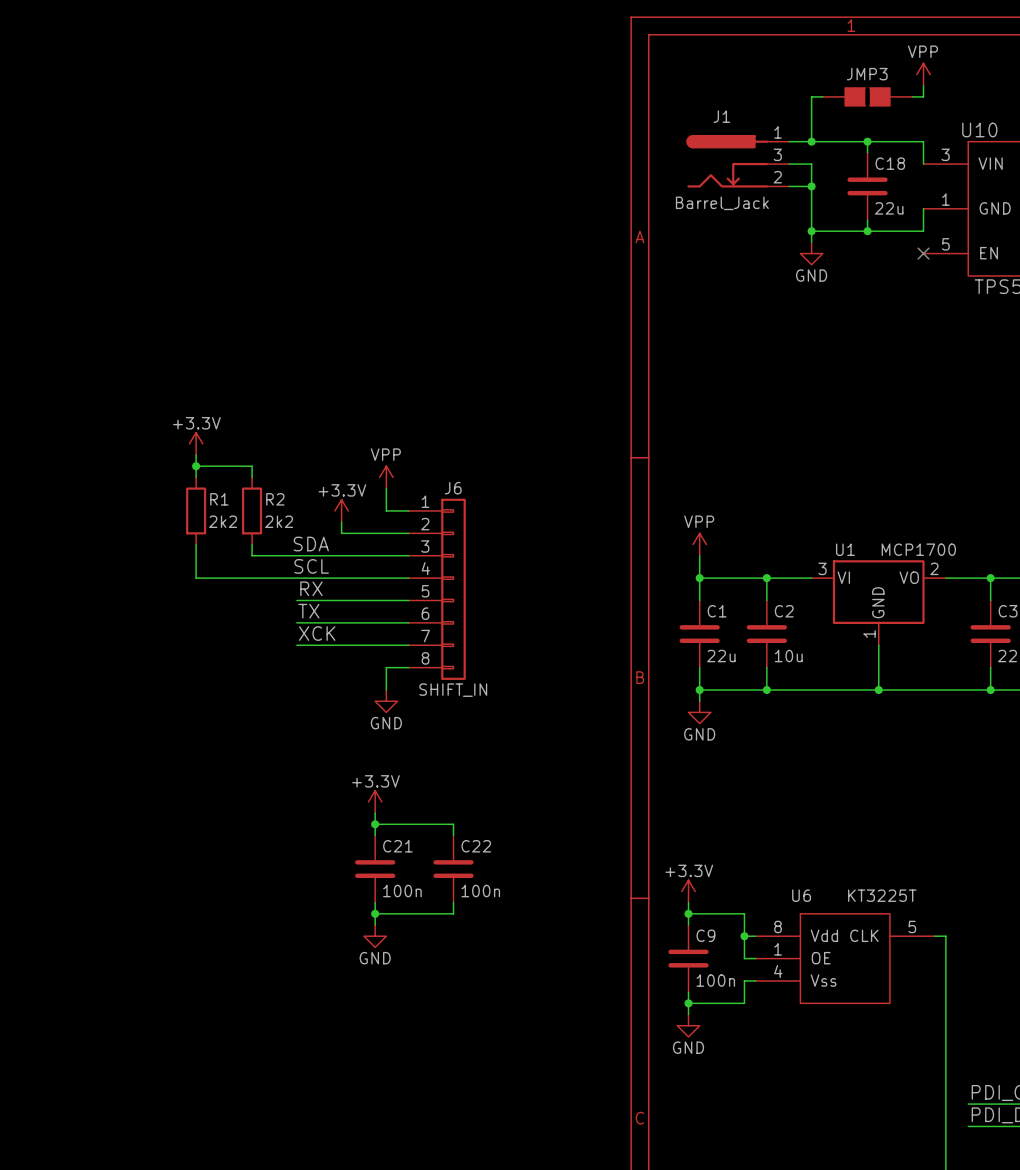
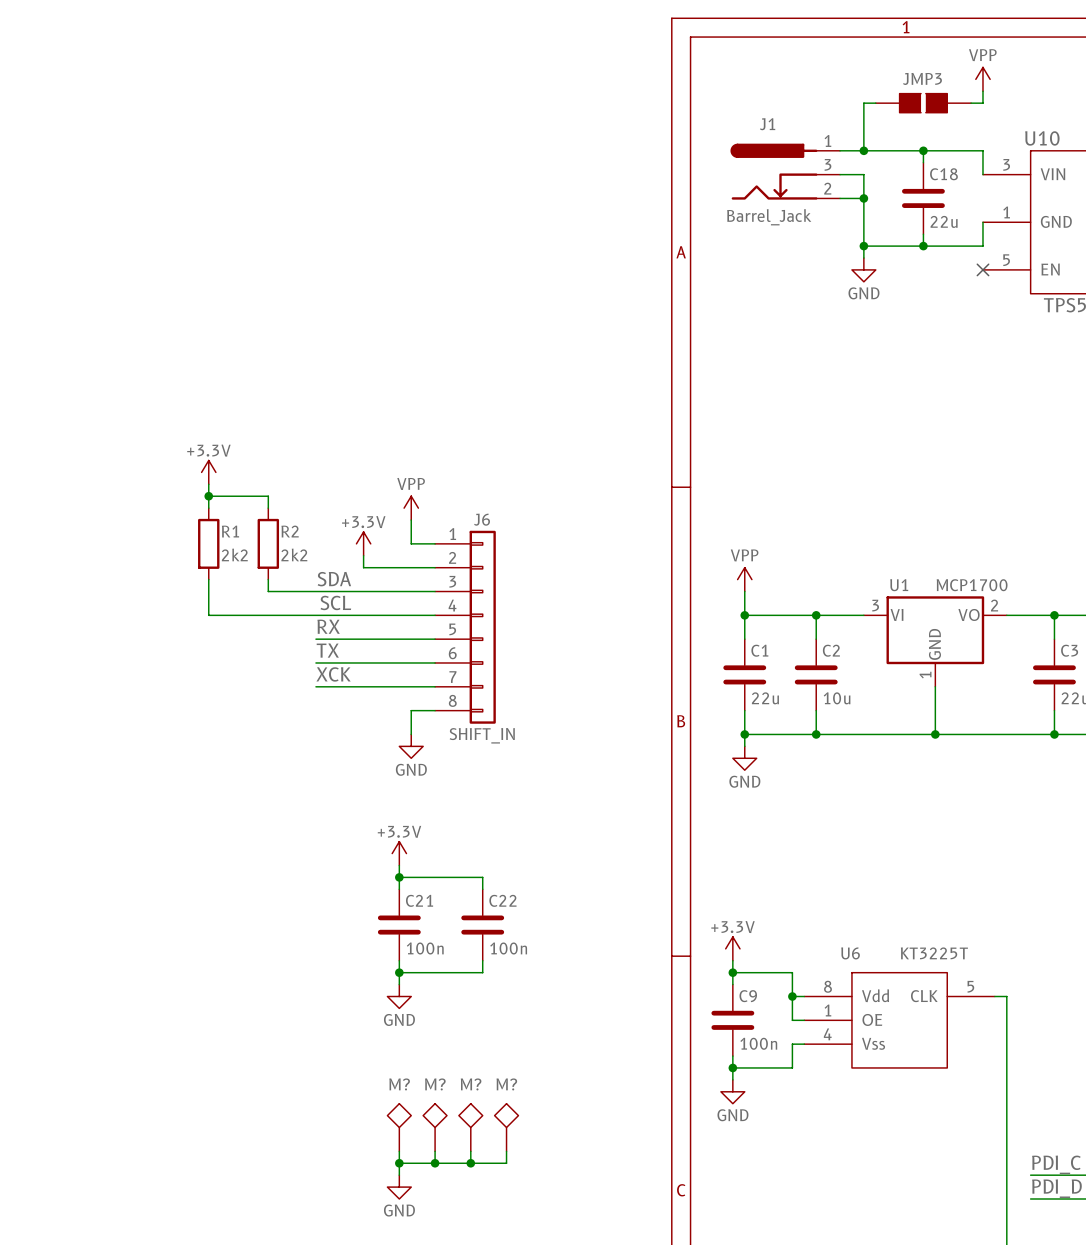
M?: none -> (399, 1127)
M?: none -> (435, 1127)
M?: none -> (470, 1127)
M?: none -> (506, 1127)
wire: none -> (399, 1151) (399, 1175)
wire: none -> (435, 1151) (435, 1163)
wire: none -> (470, 1151) (470, 1163)
wire: none -> (506, 1151) (506, 1163) (399, 1163)
junction: none -> (399, 1163)
junction: none -> (435, 1163)
junction: none -> (470, 1163)
power symbol: none -> GND (399, 1187)

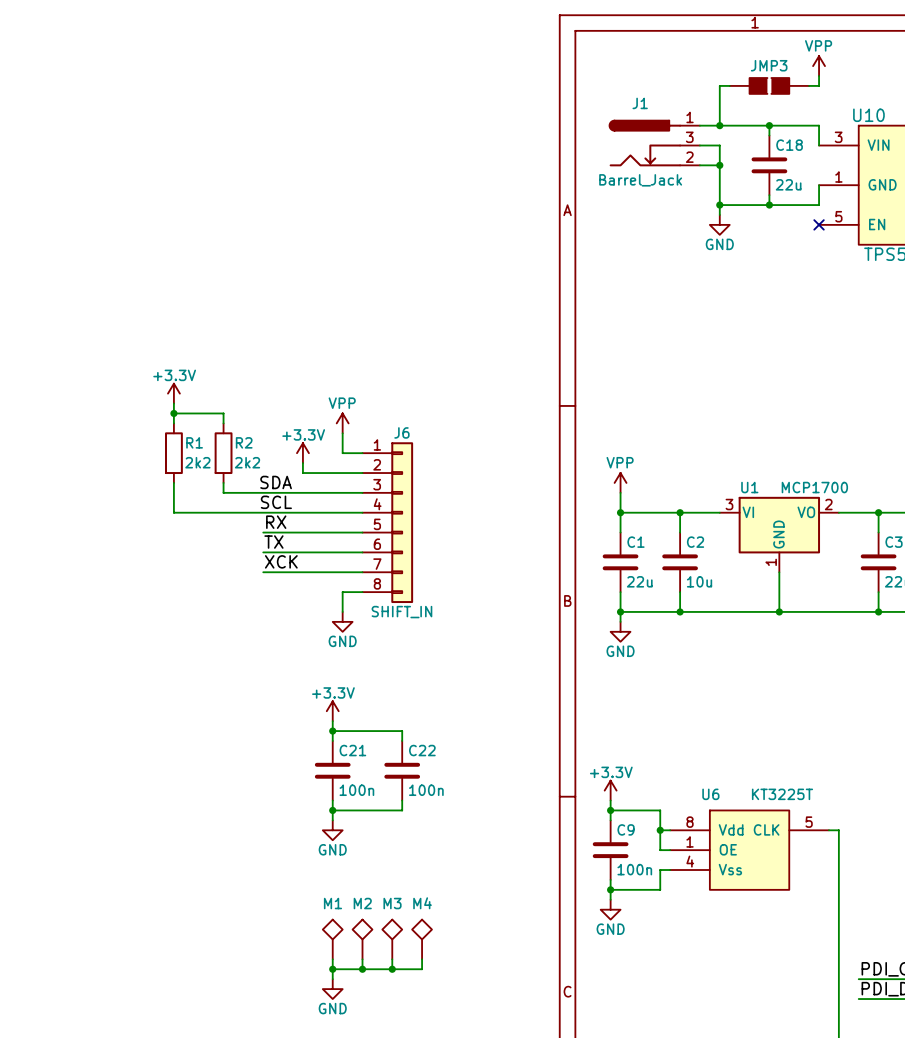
M? name: M? (399, 1084) -> M1 (332, 903)
M? name: M? (435, 1084) -> M2 (362, 903)
M? name: M? (471, 1084) -> M3 (392, 903)
M? name: M? (506, 1084) -> M4 (422, 903)

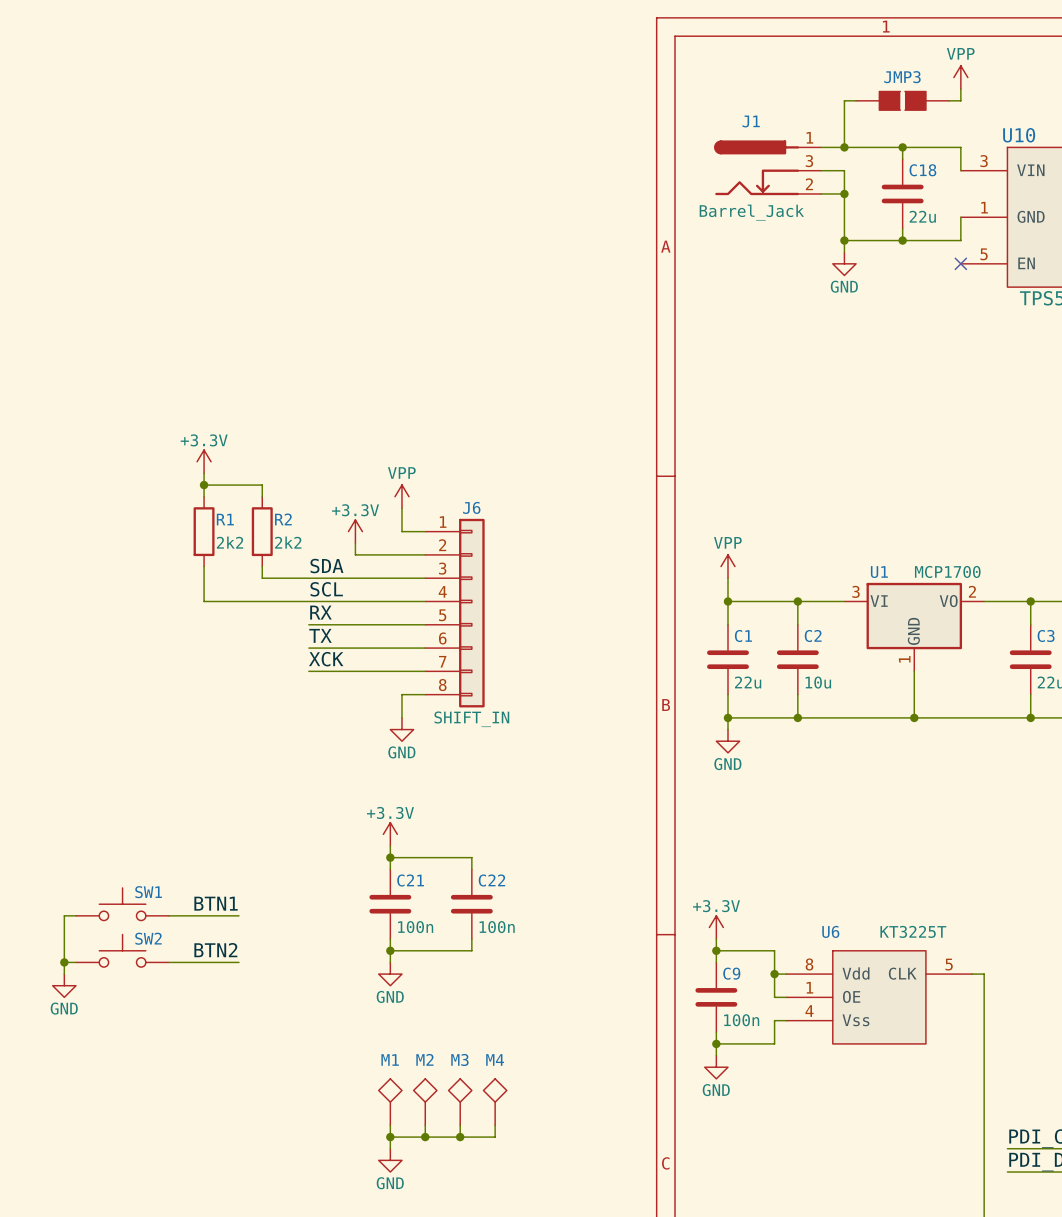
SW1: none -> (122, 904)
label: none -> BTN1 (216, 903)
wire: none -> (75, 915) (64, 915) (64, 974)
wire: none -> (169, 915) (238, 915)
label: none -> BTN2 (215, 950)
SW2: none -> (122, 950)
wire: none -> (64, 962) (75, 962)
junction: none -> (64, 962)
wire: none -> (169, 962) (238, 962)
power symbol: none -> GND (64, 985)

